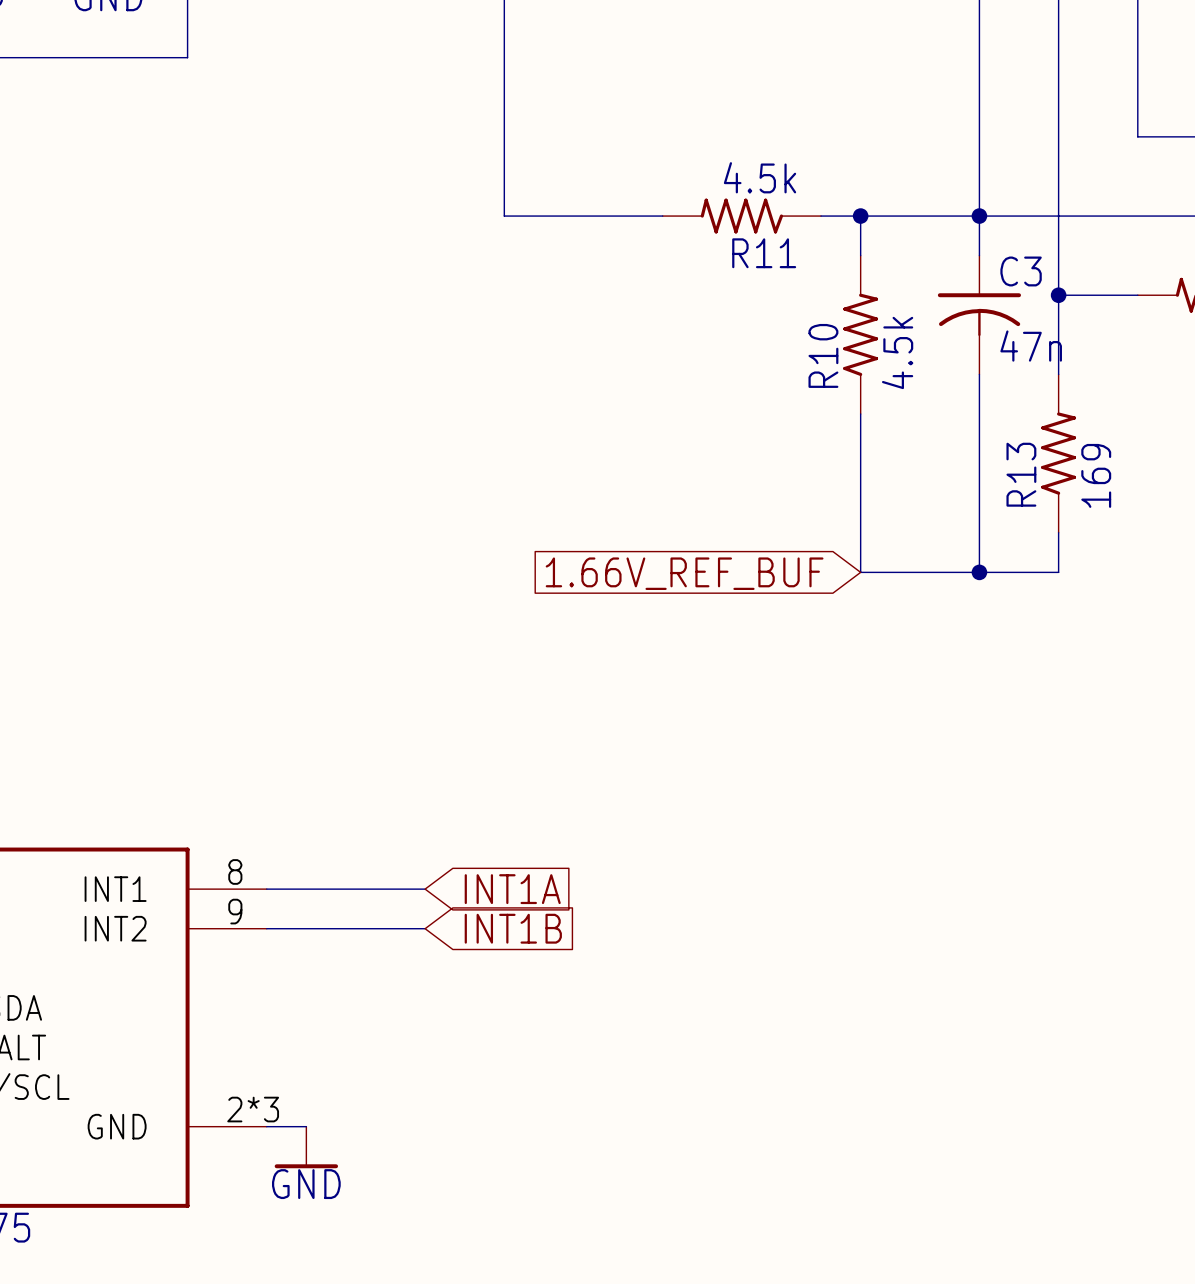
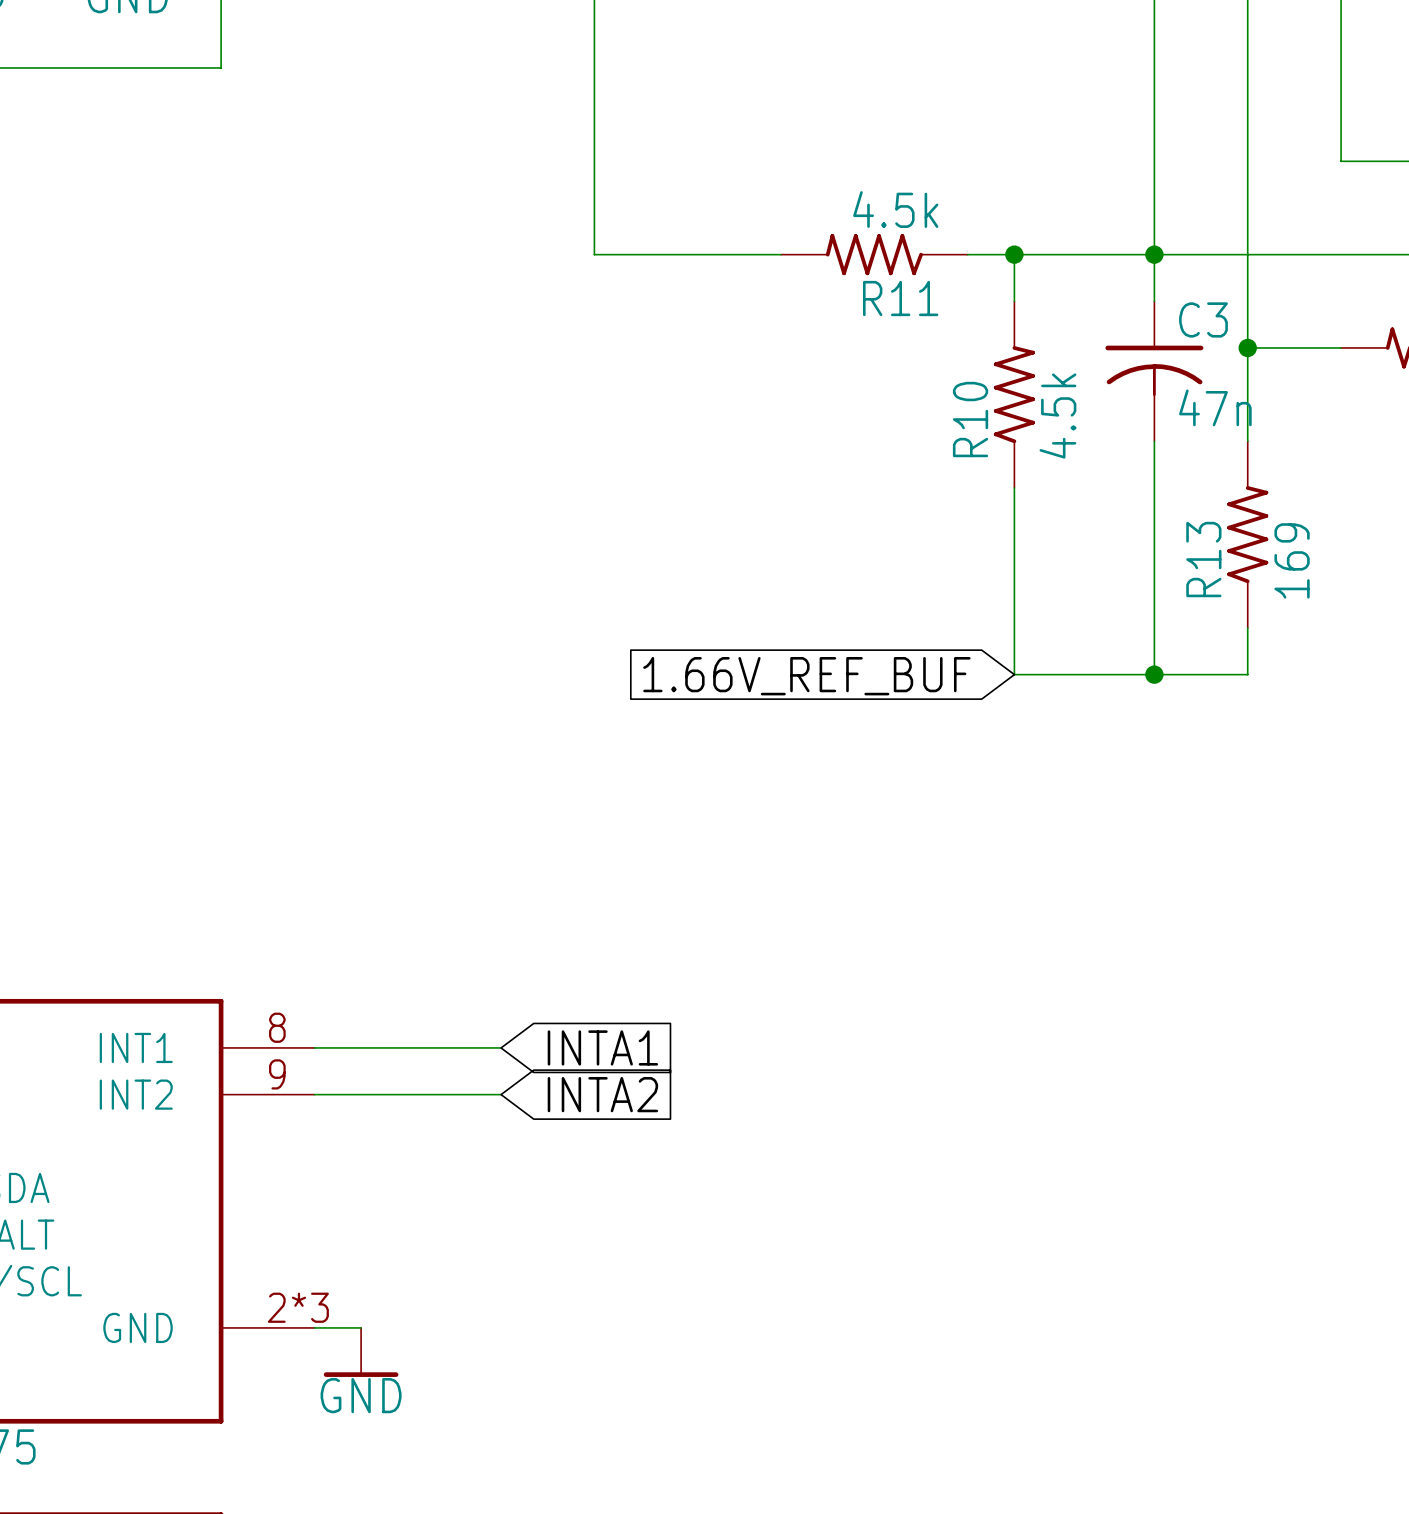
global label: INT1A (512, 889) -> INTA1 (602, 1047)
global label: INT1B (513, 928) -> INTA2 (602, 1094)

